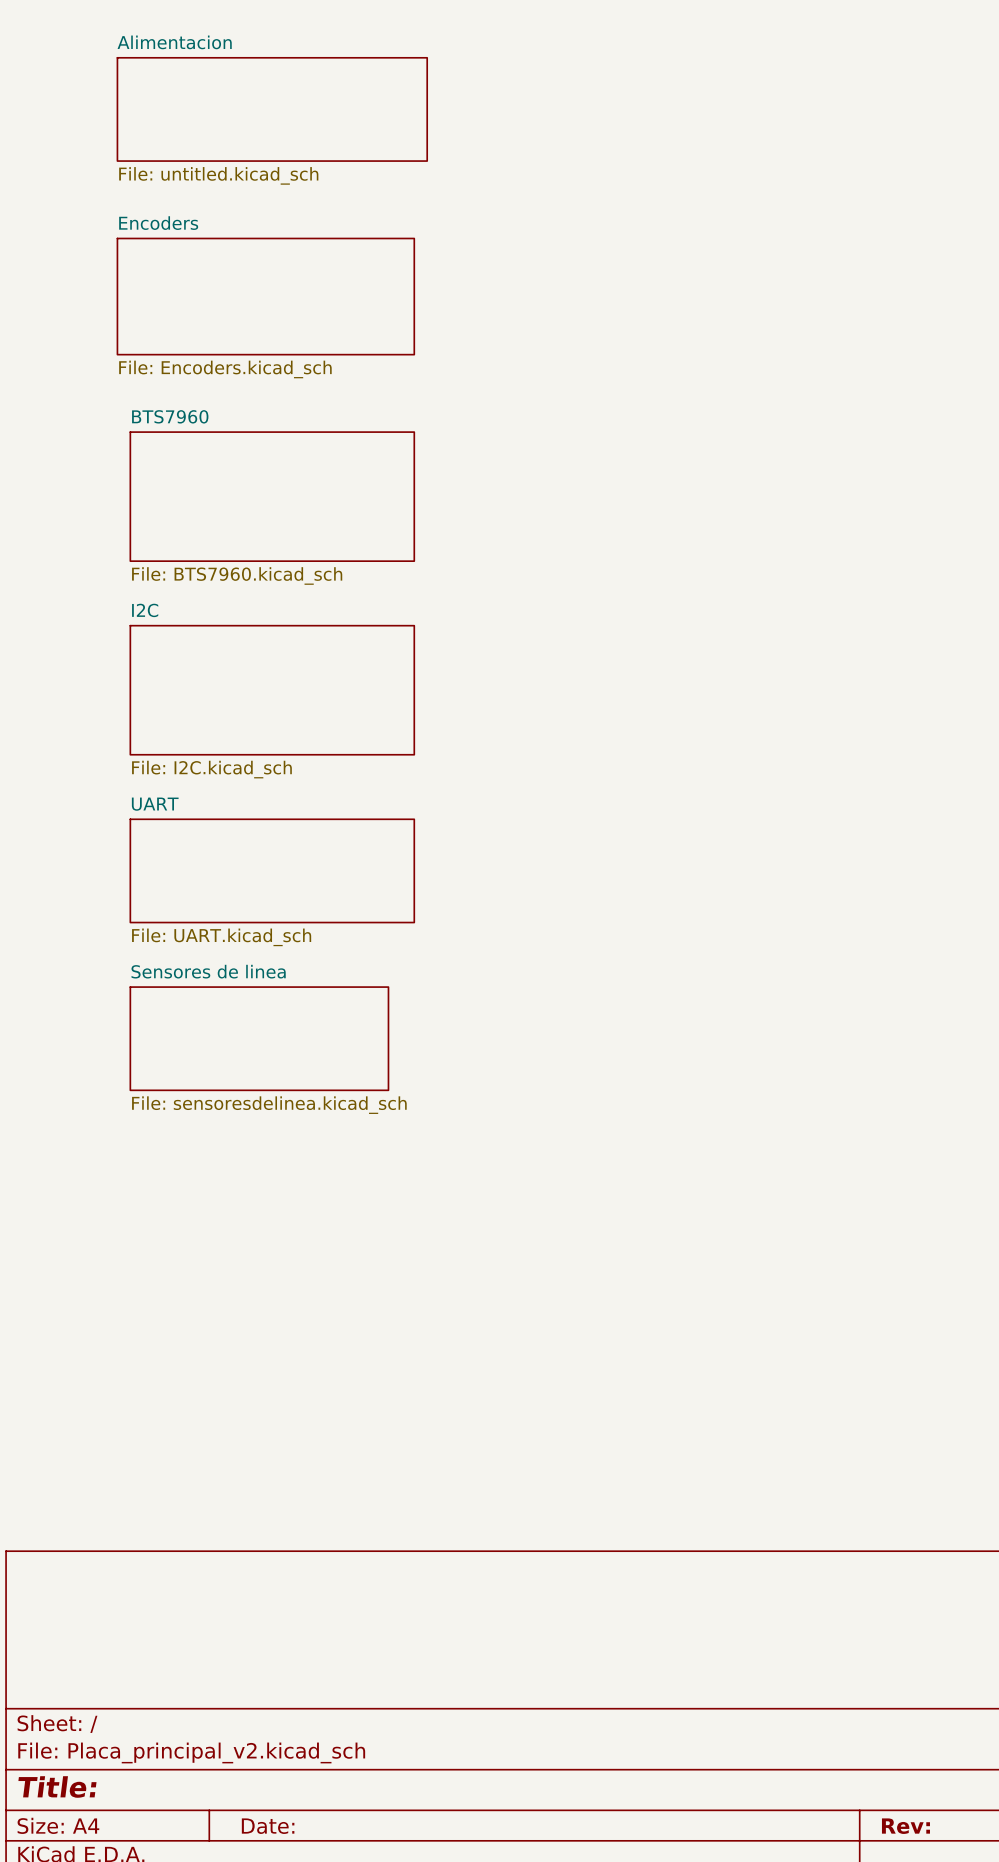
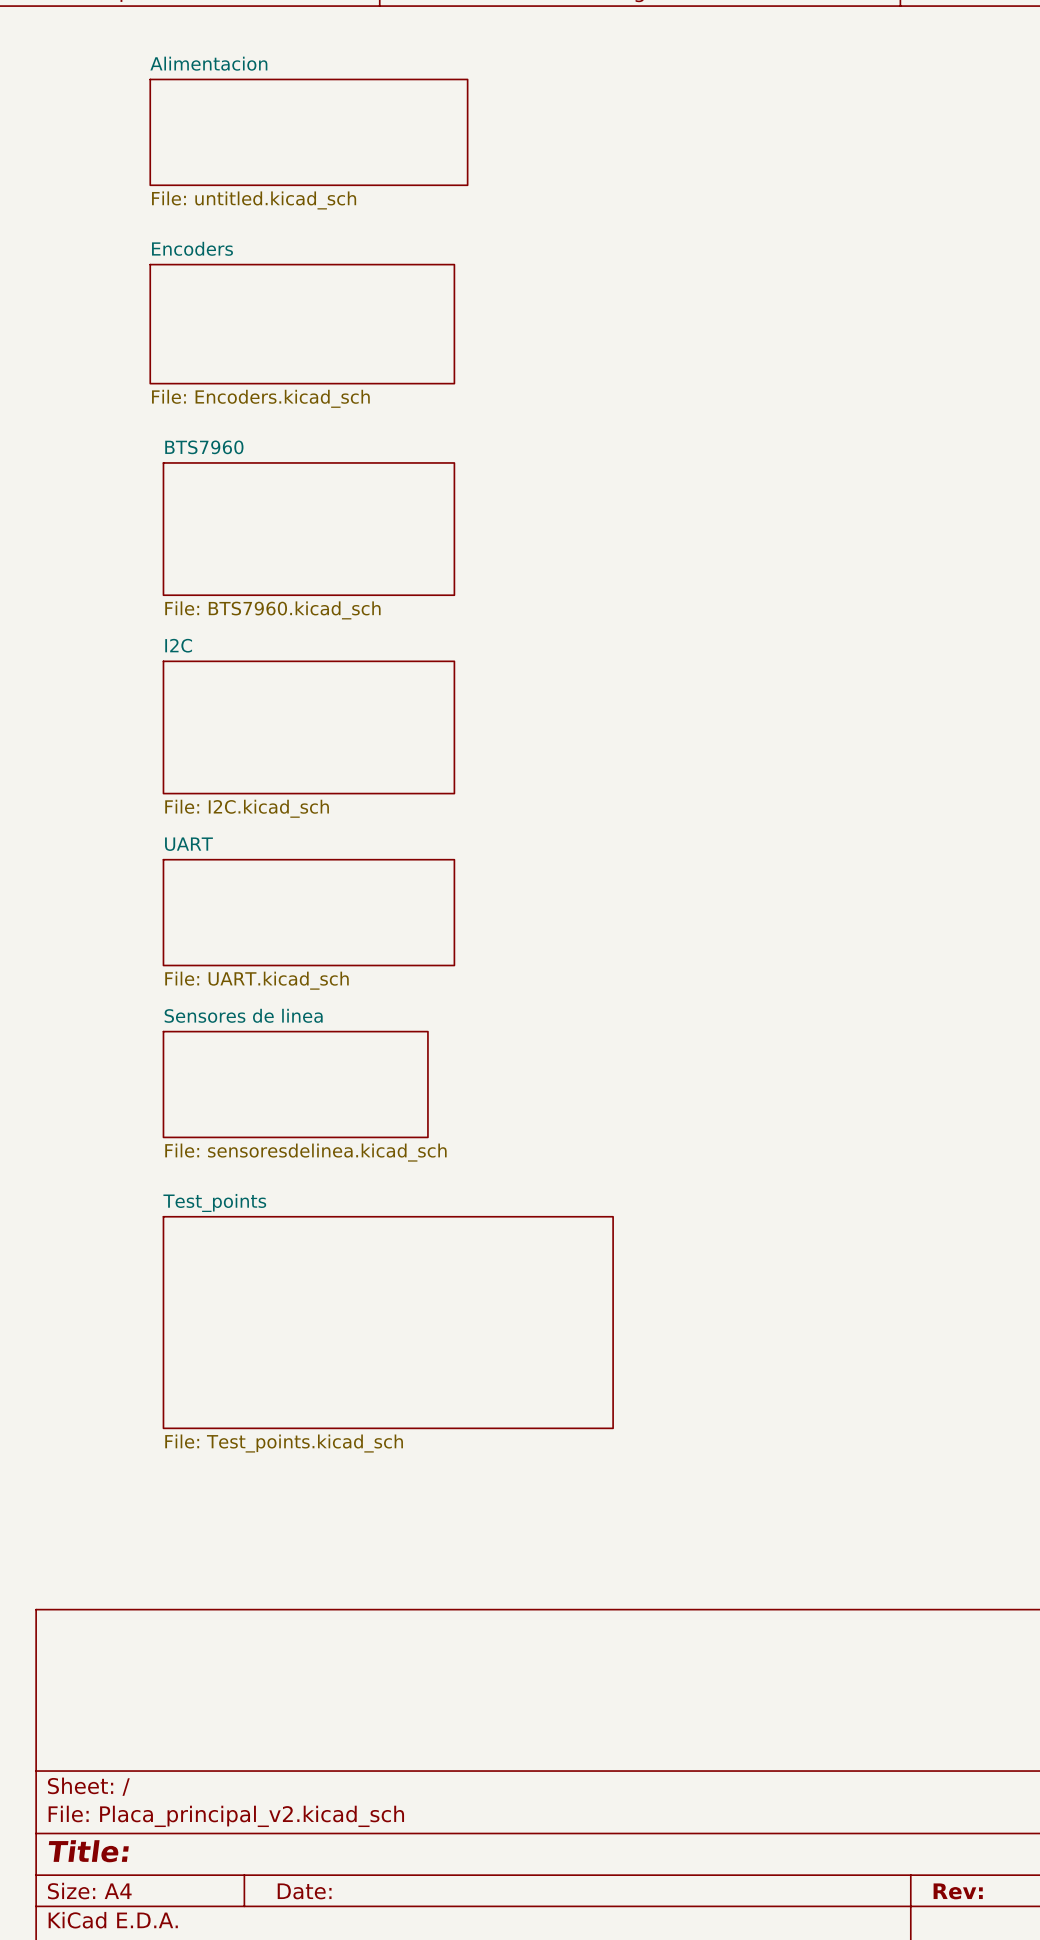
sheet Test_points: none -> File: Test_points.kicad_sch (388, 1322)

